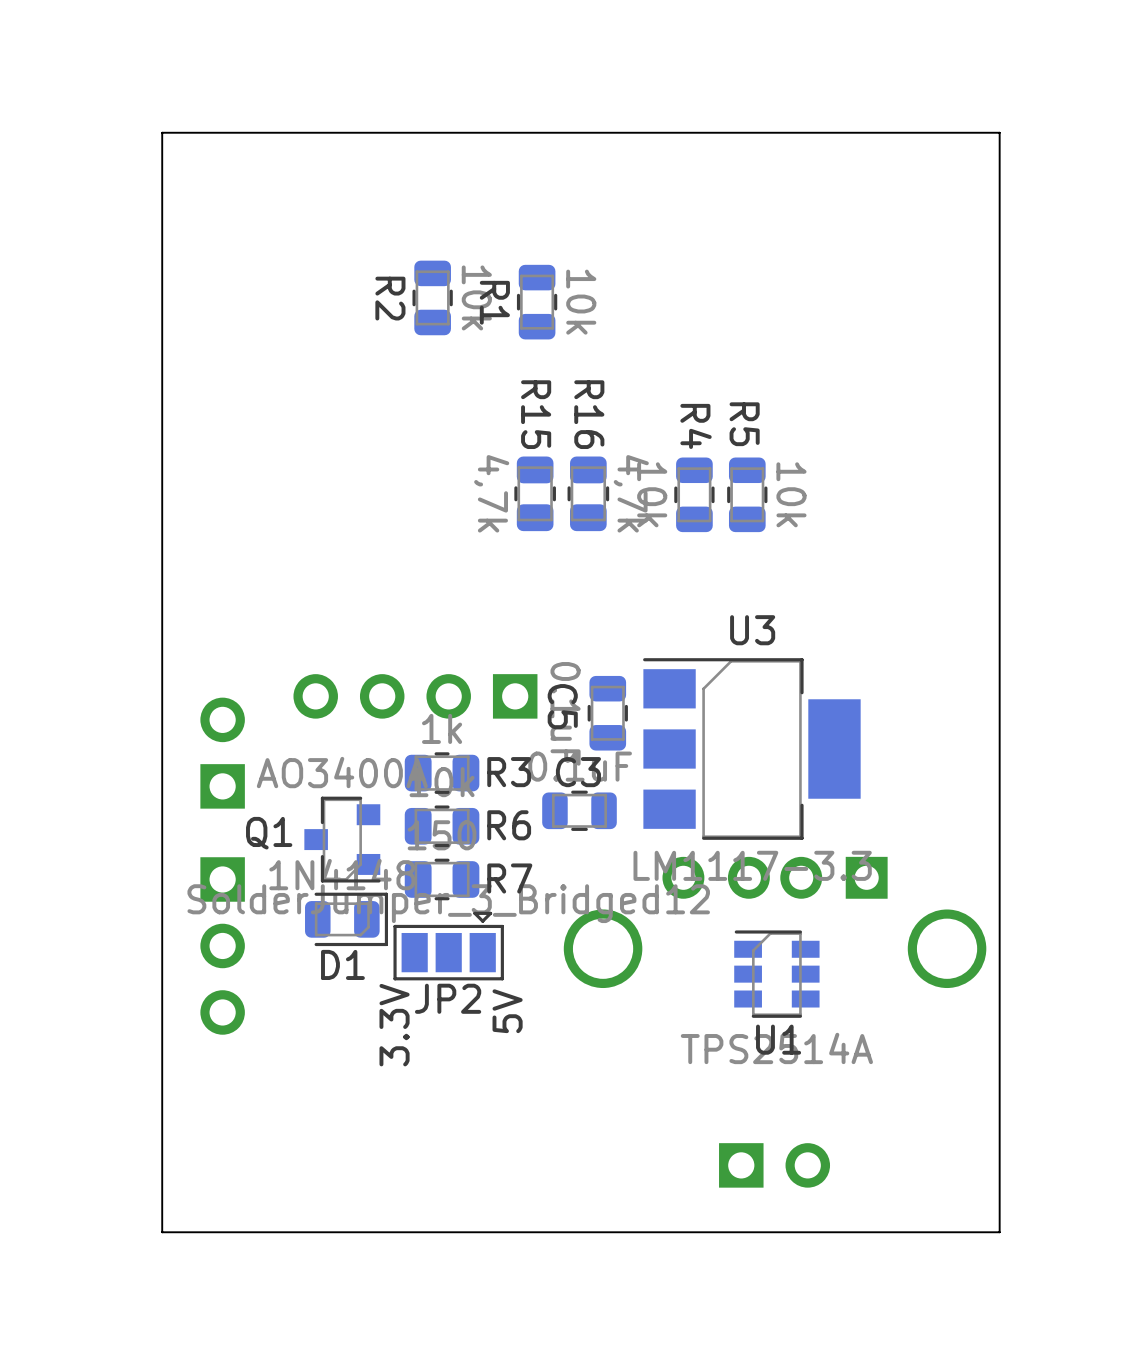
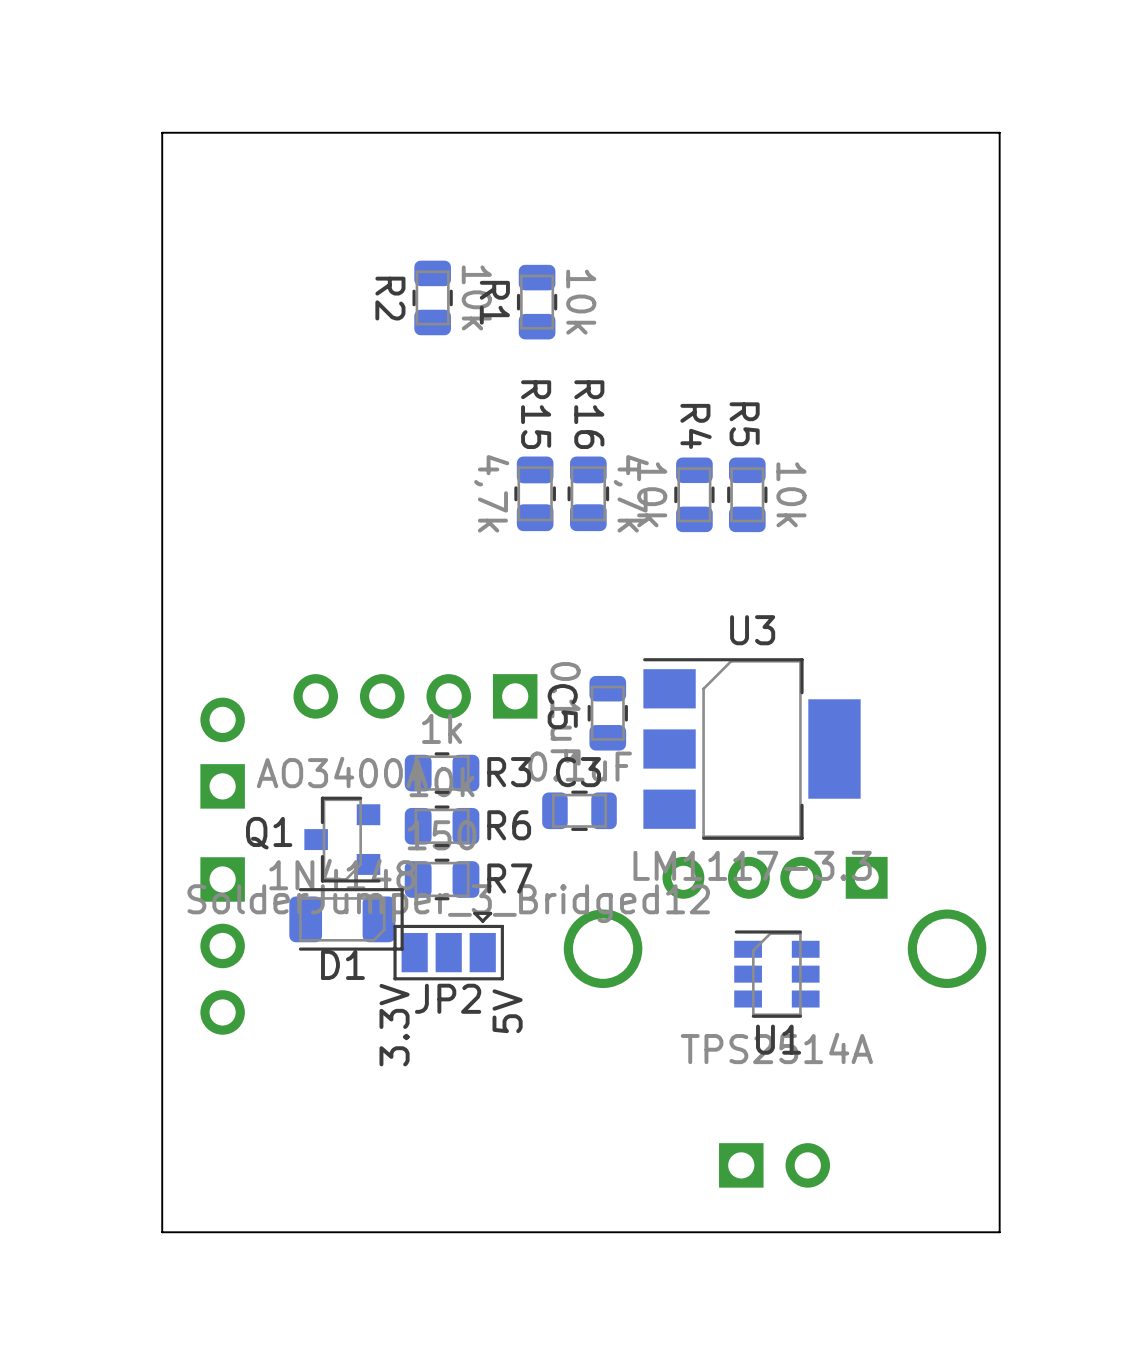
D1 footprint: [305, 892, 389, 947] -> [289, 888, 404, 951]

